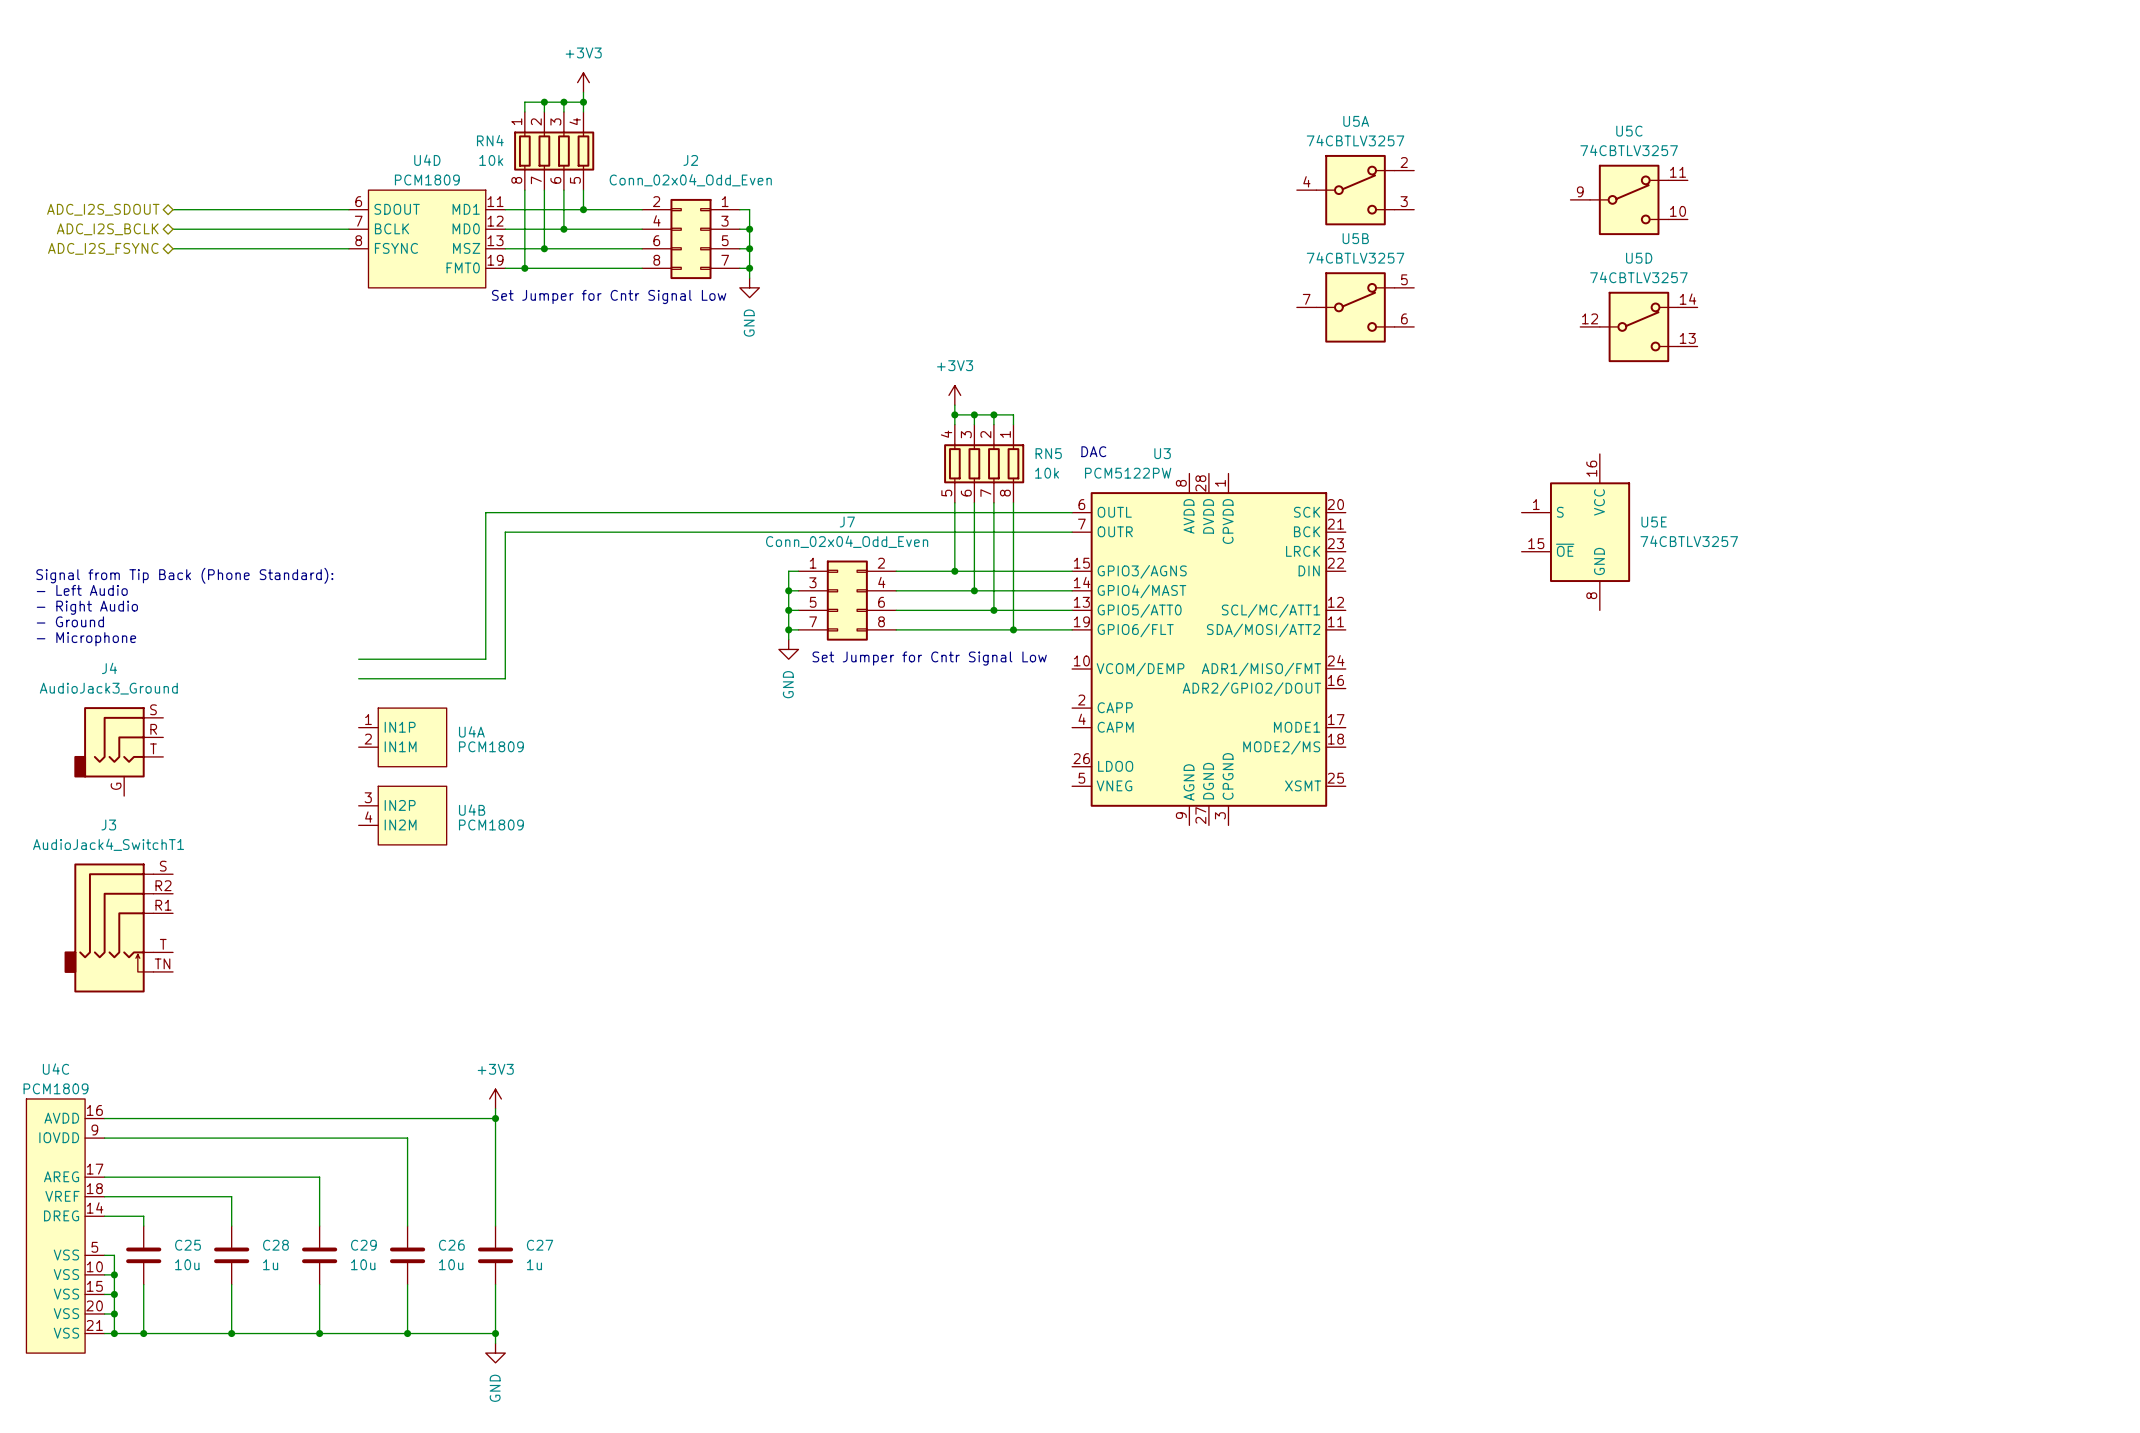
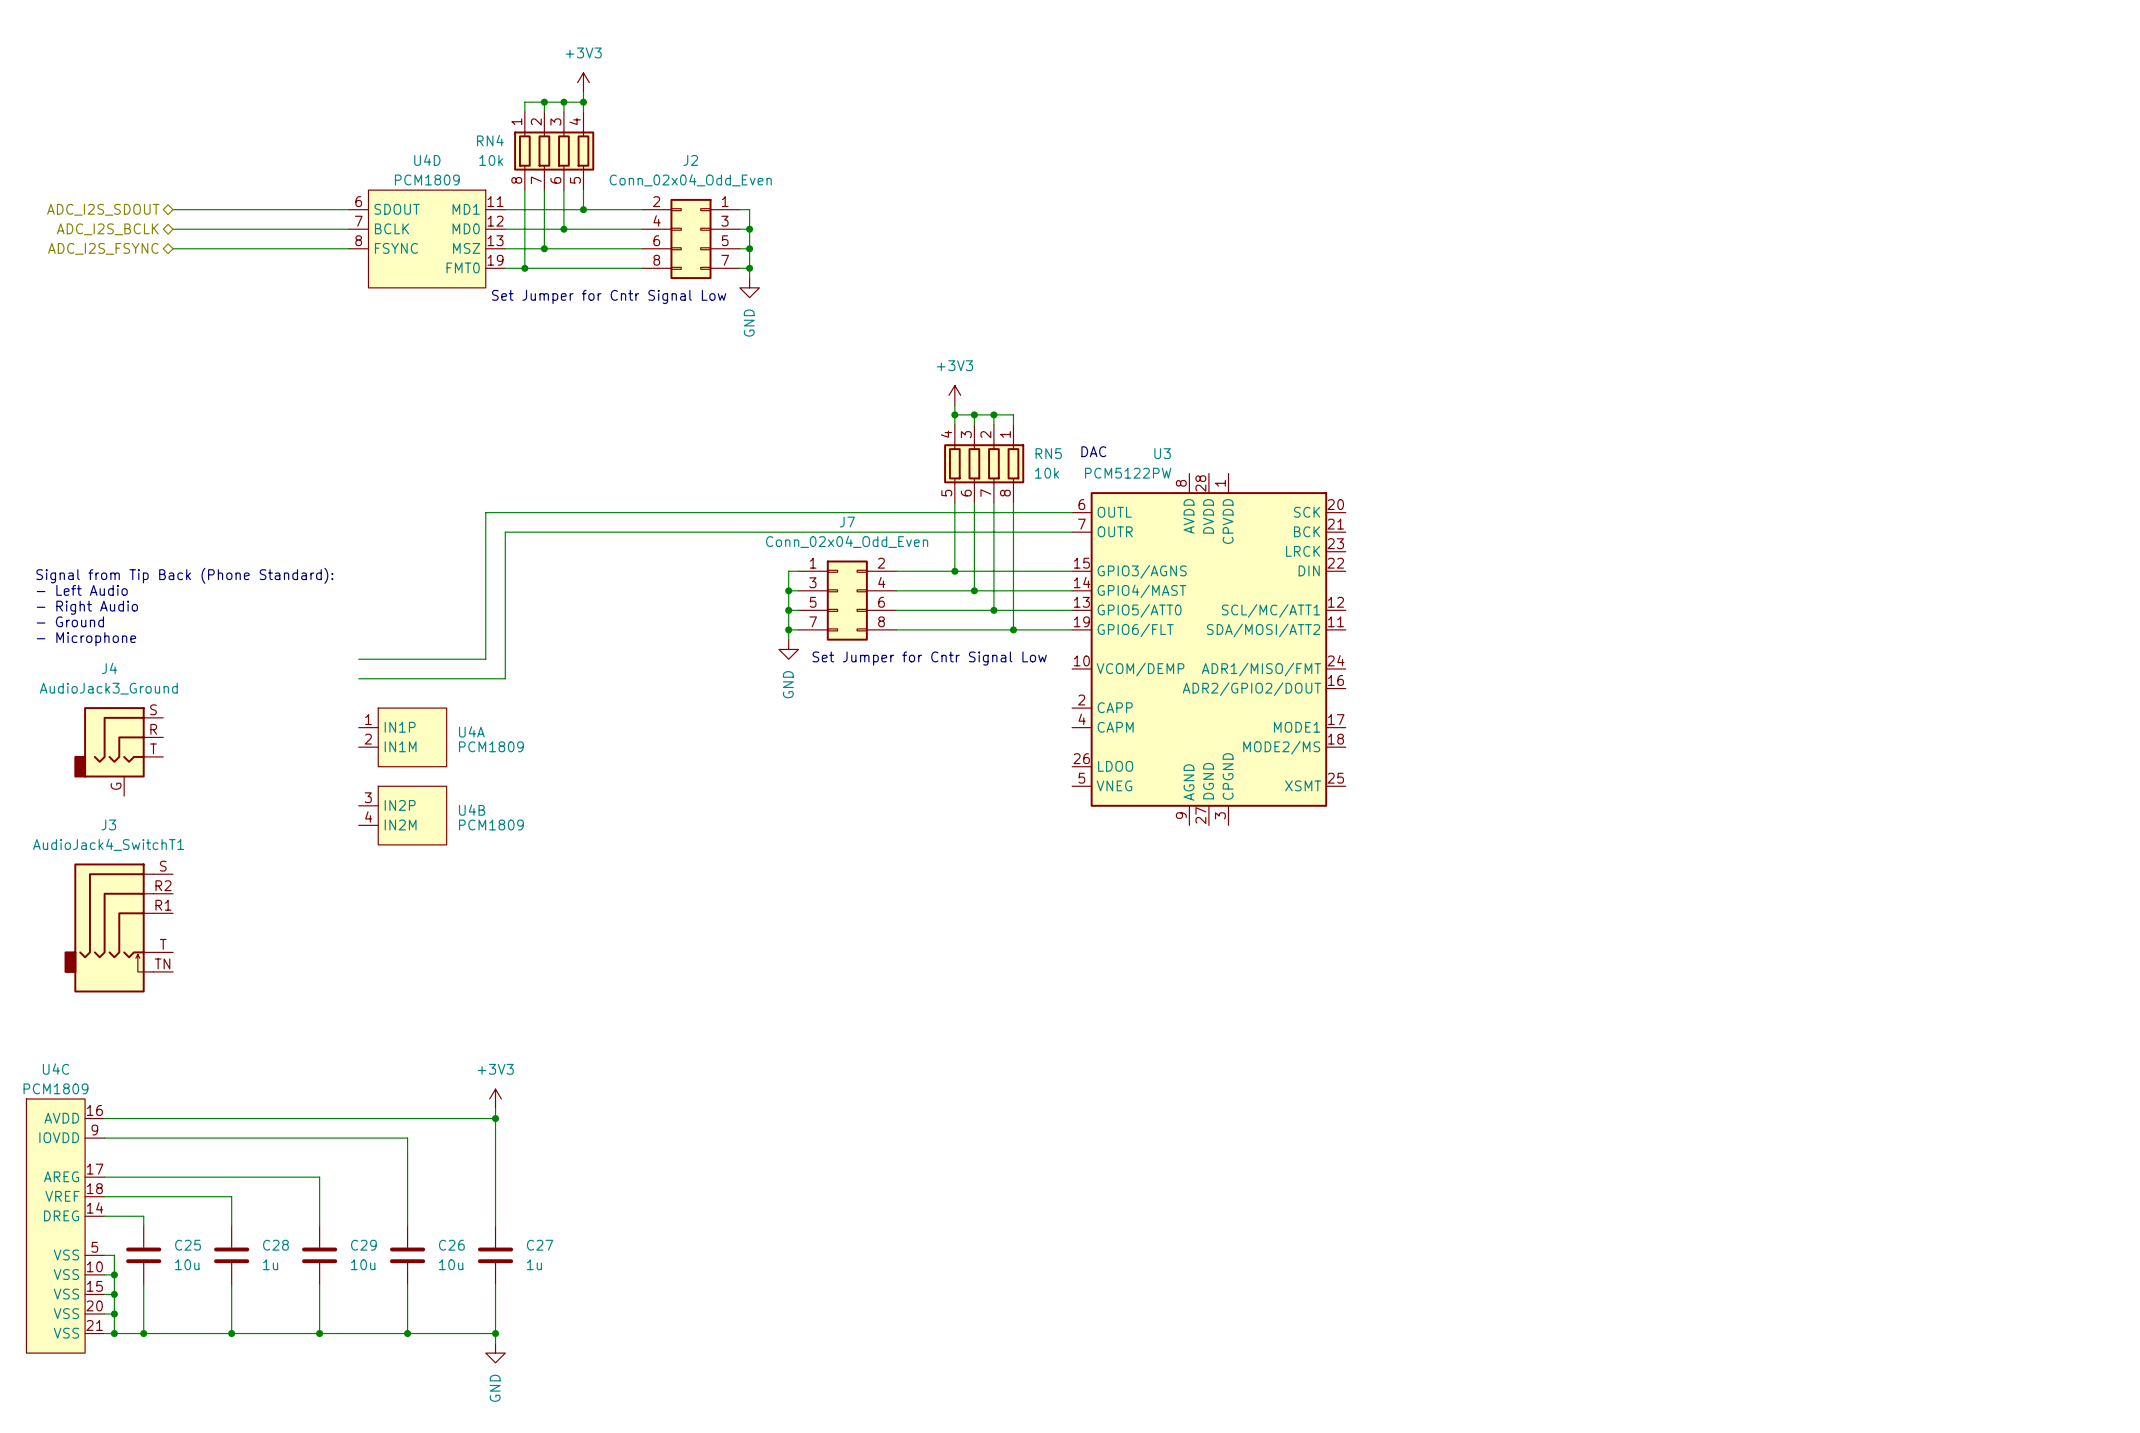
U5A: 74CBTLV3257 (1355, 190) -> none
U5C: 74CBTLV3257 (1629, 199) -> none
U5B: 74CBTLV3257 (1355, 307) -> none
U5D: 74CBTLV3257 (1638, 326) -> none
U5E: 74CBTLV3257 (1575, 532) -> none

